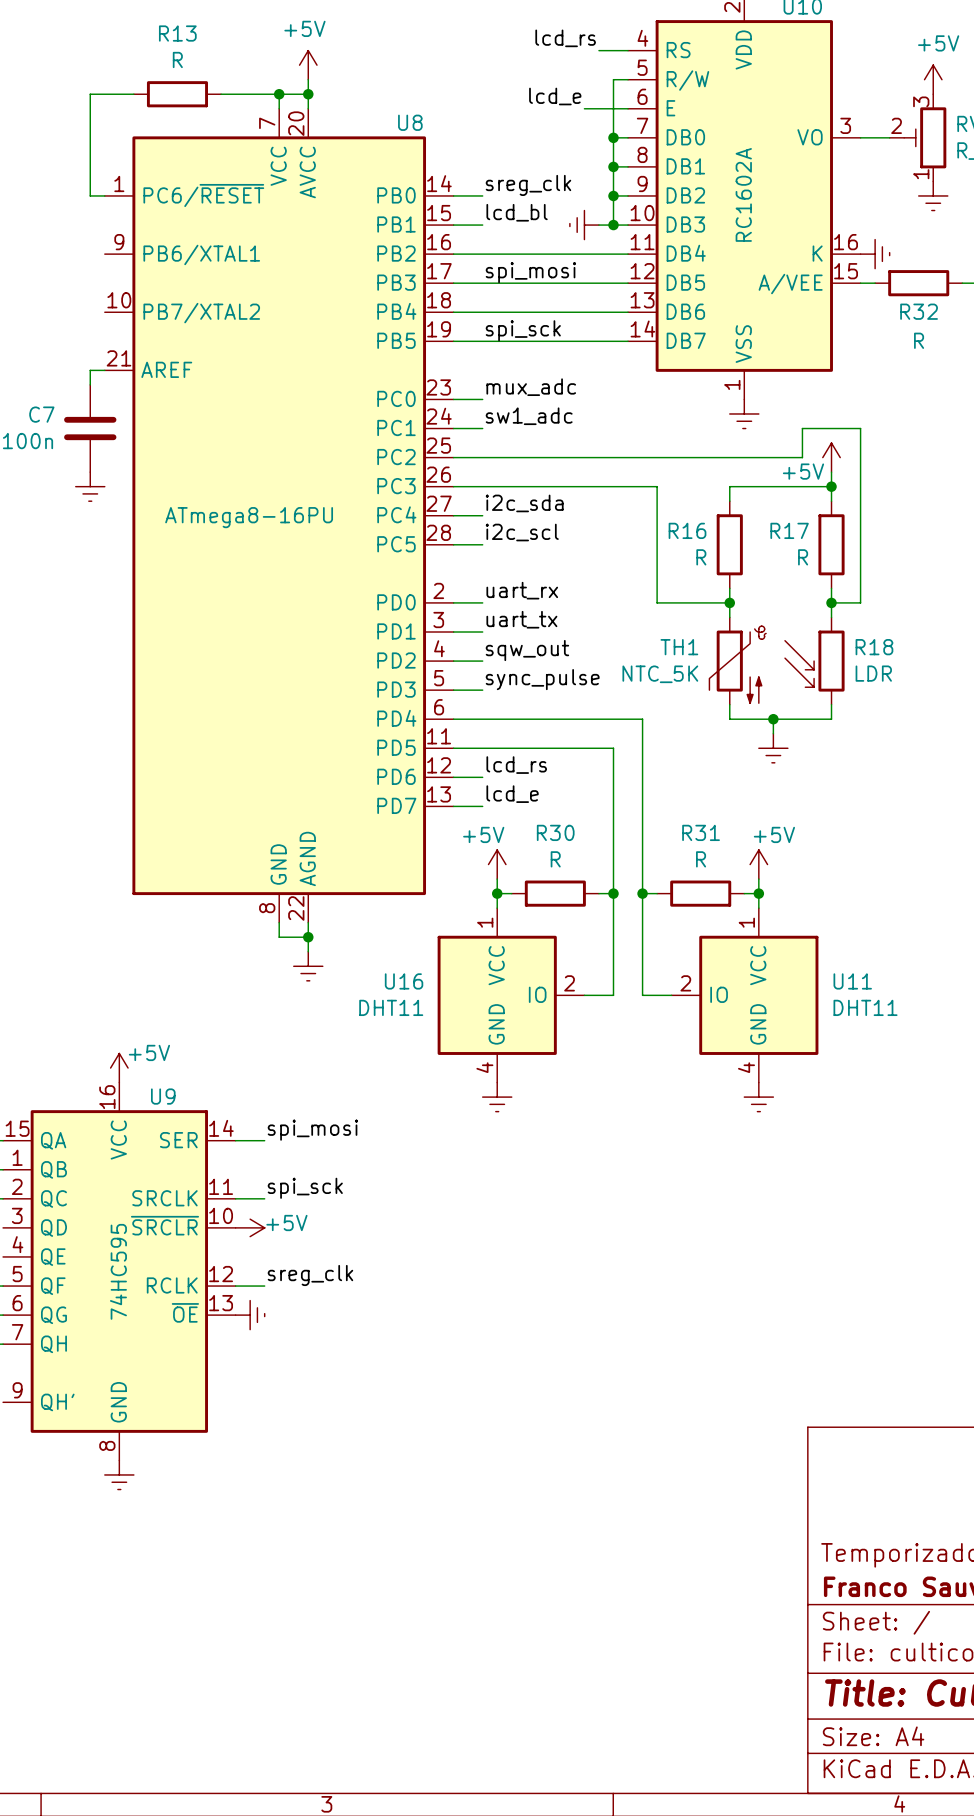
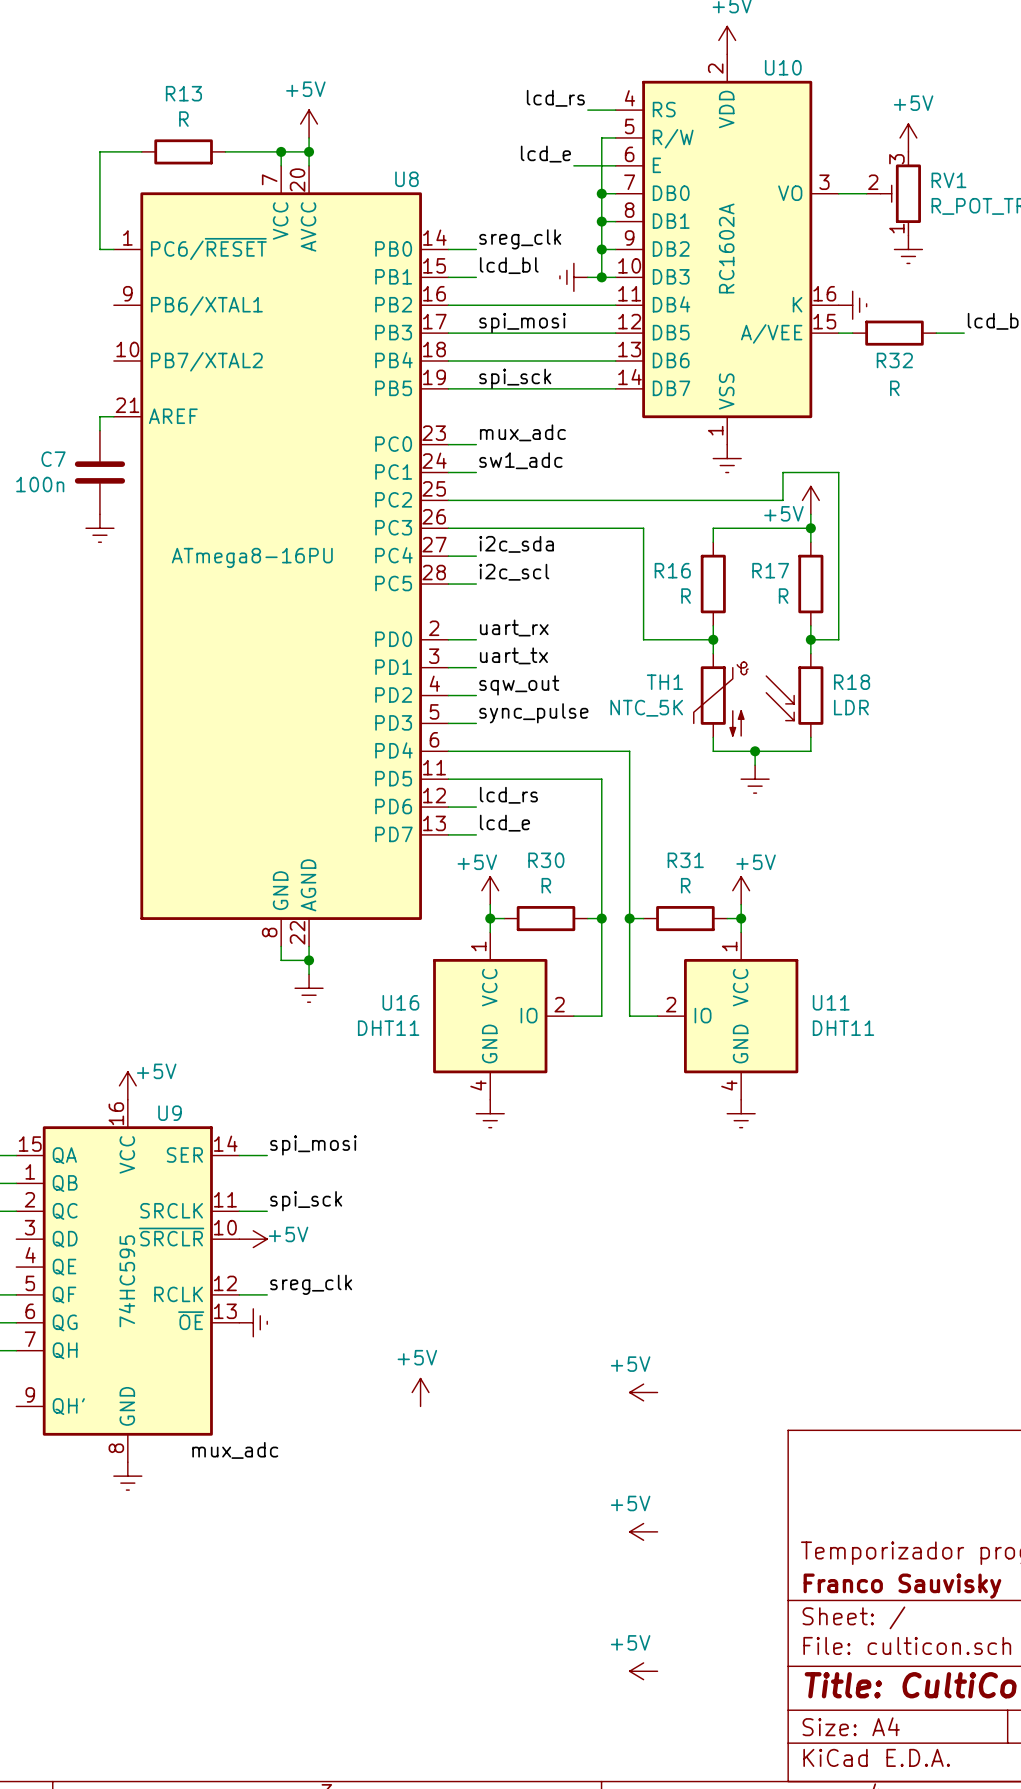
power symbol: none -> +5V (420, 1392)
power symbol: none -> +5V (643, 1392)
label: none -> mux_adc (235, 1450)
power symbol: none -> +5V (643, 1531)
power symbol: none -> +5V (643, 1671)

